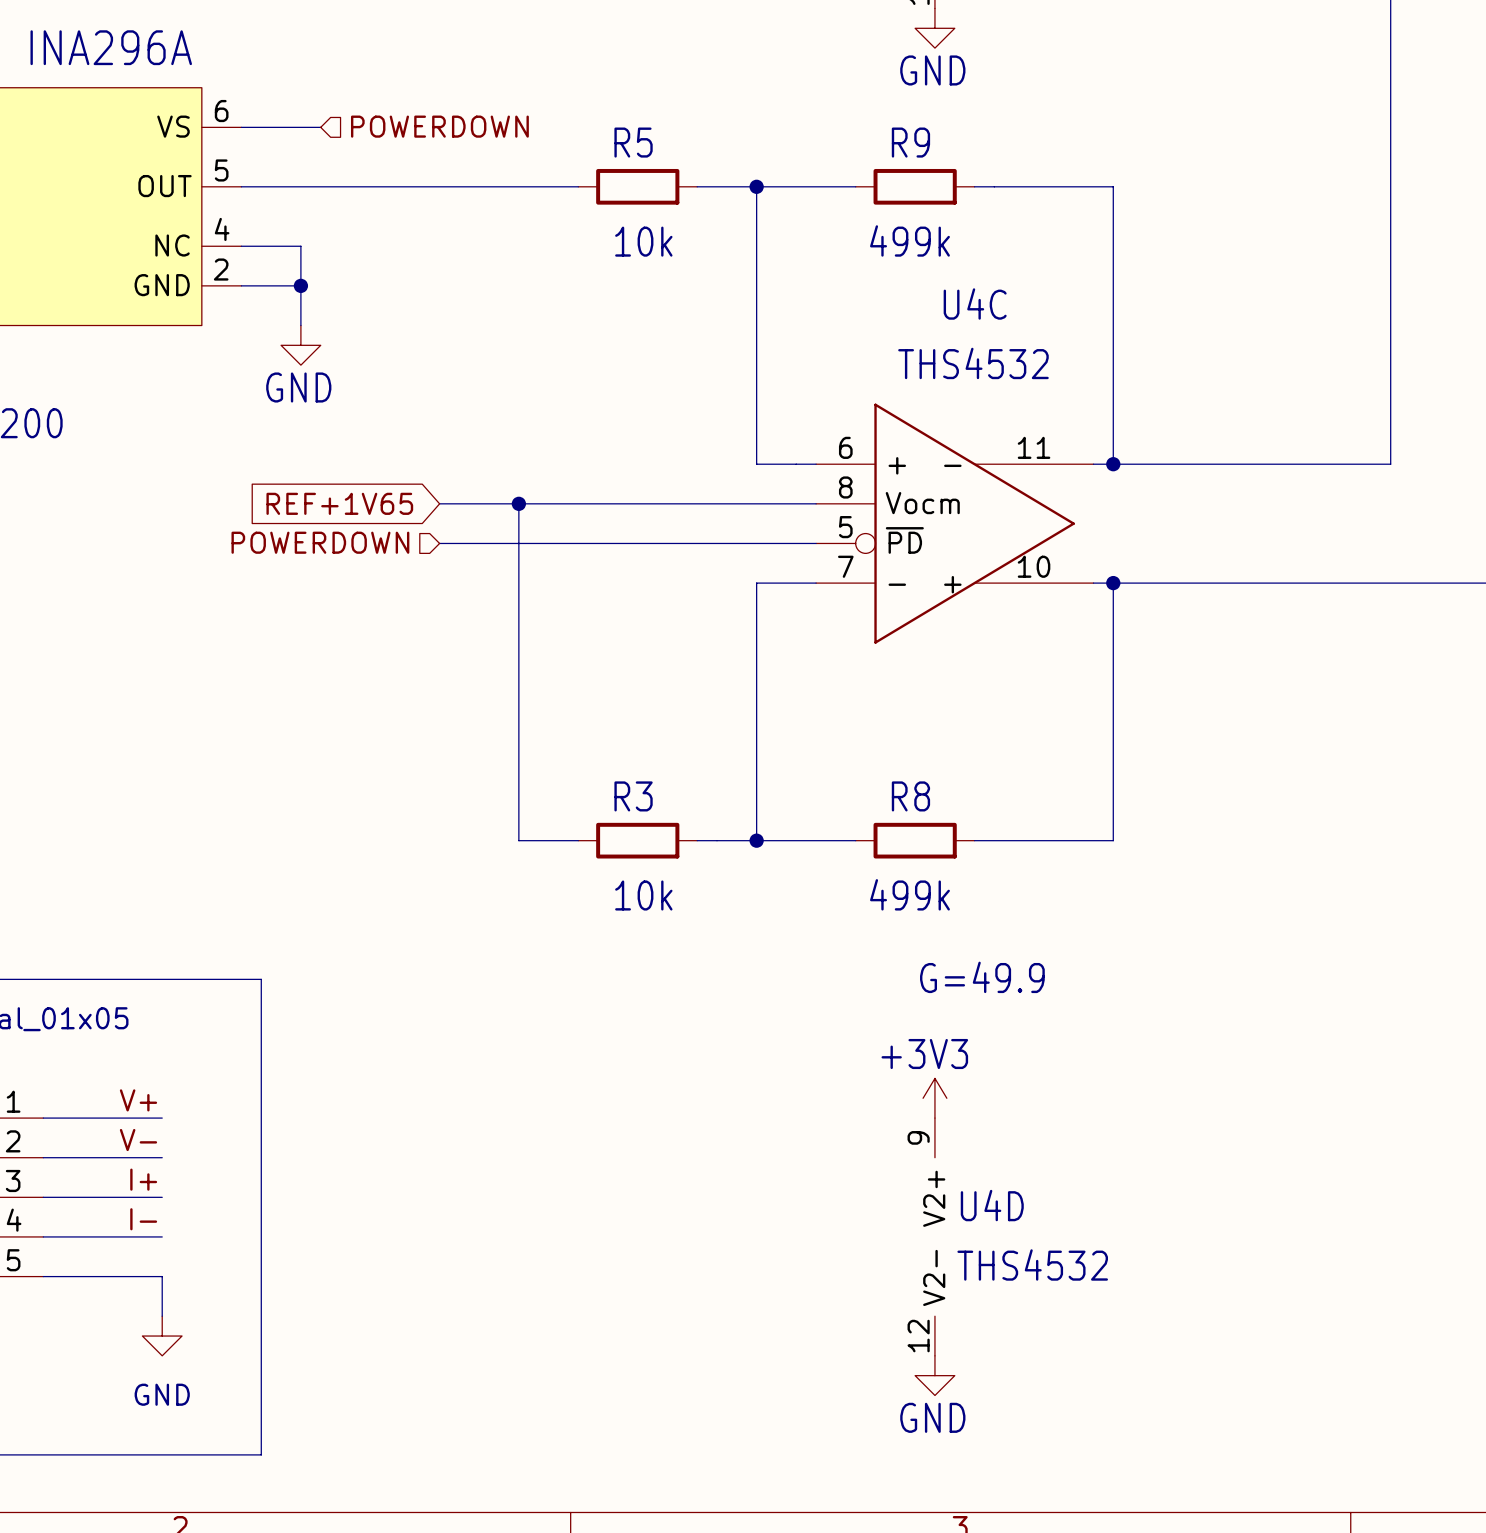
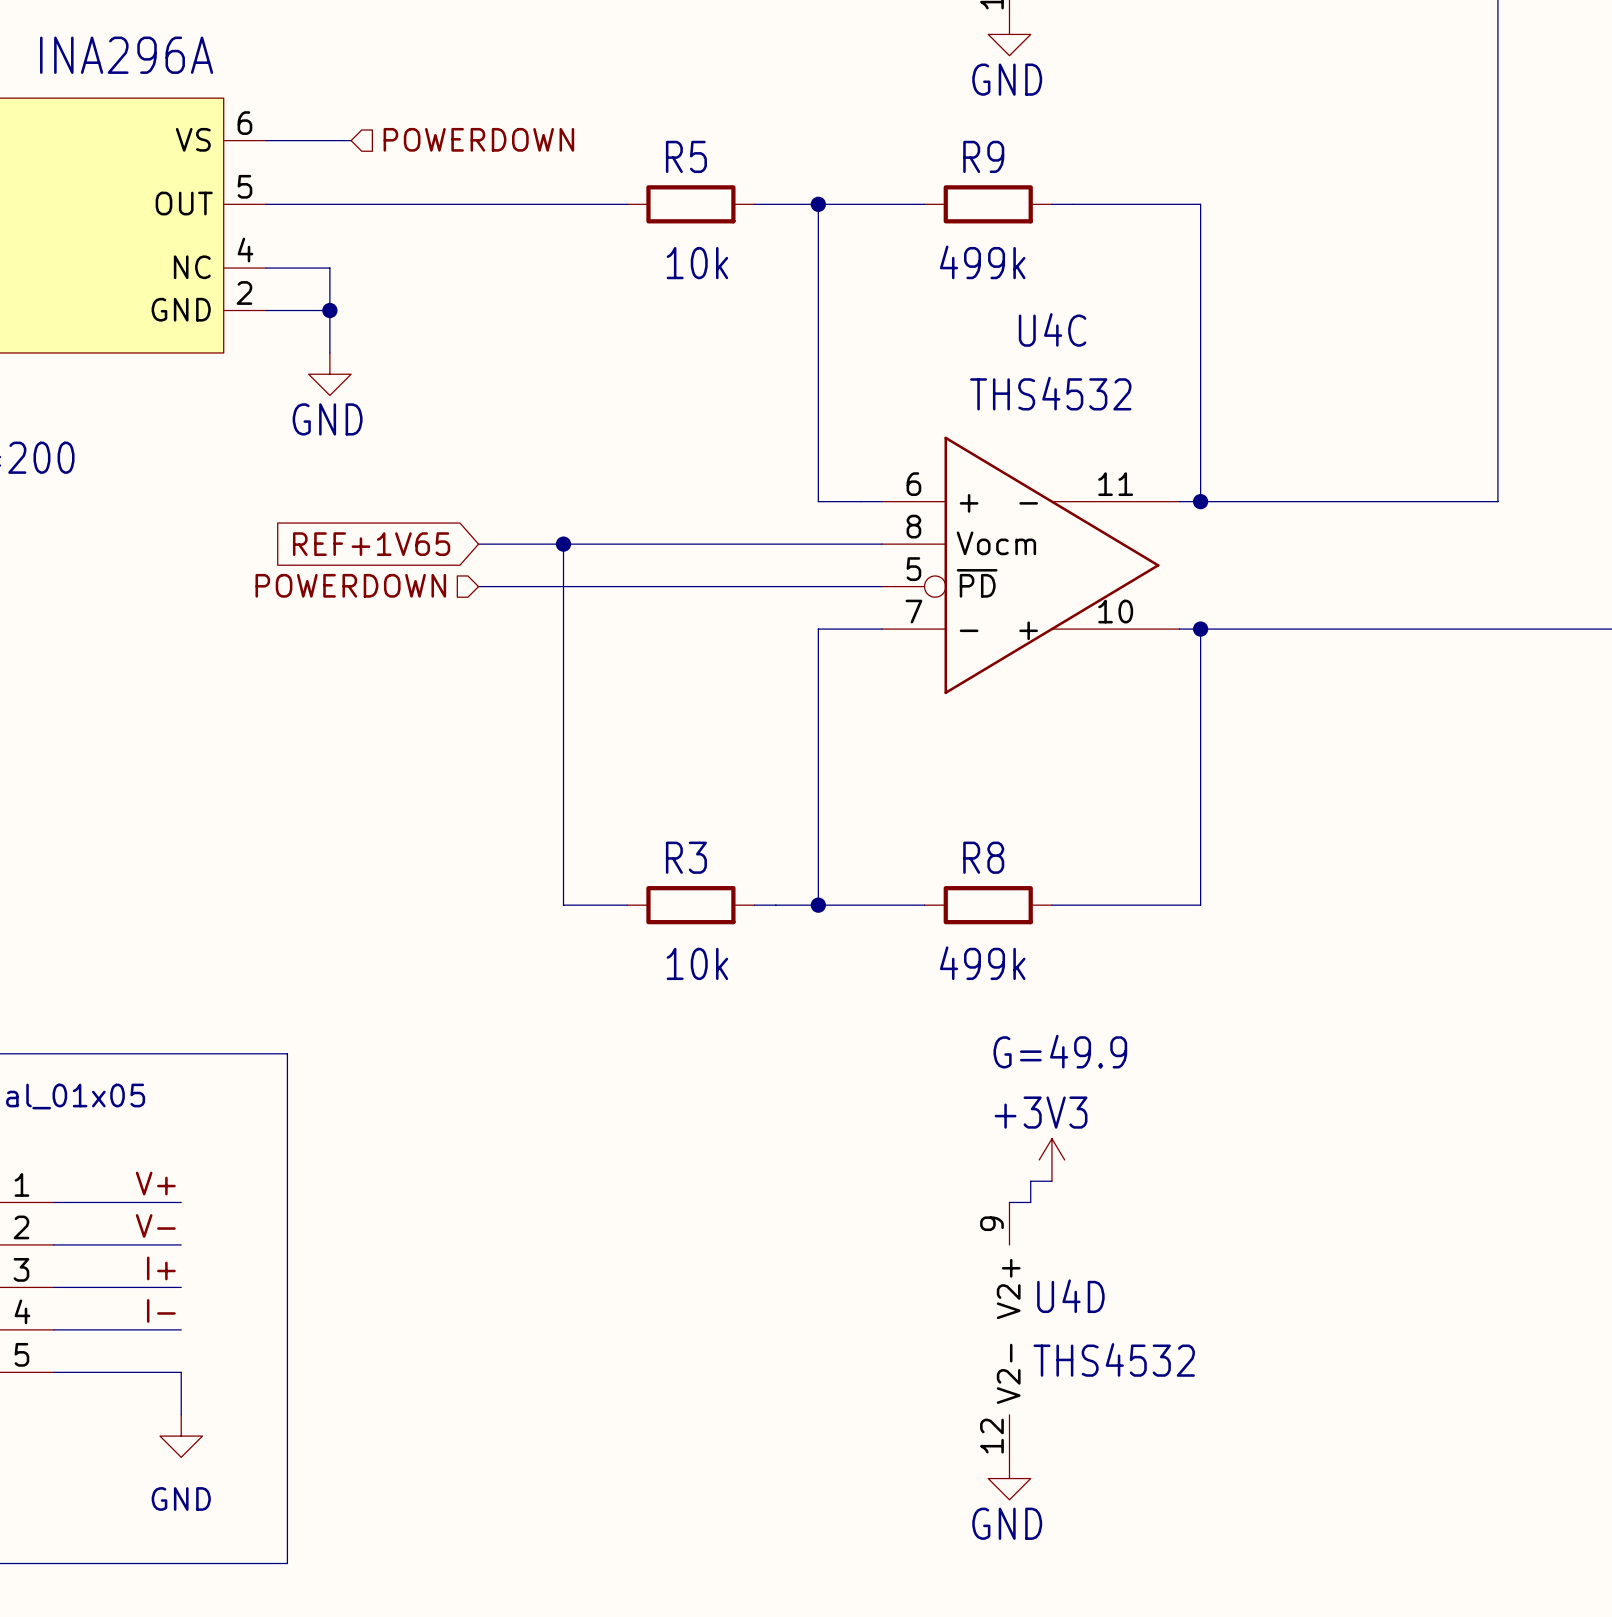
power symbol position: +3V3 (934, 1098) -> +3V3 (1051, 1160)
wire: none -> (1051, 1181) (1030, 1181) (1030, 1202) (1009, 1202)

